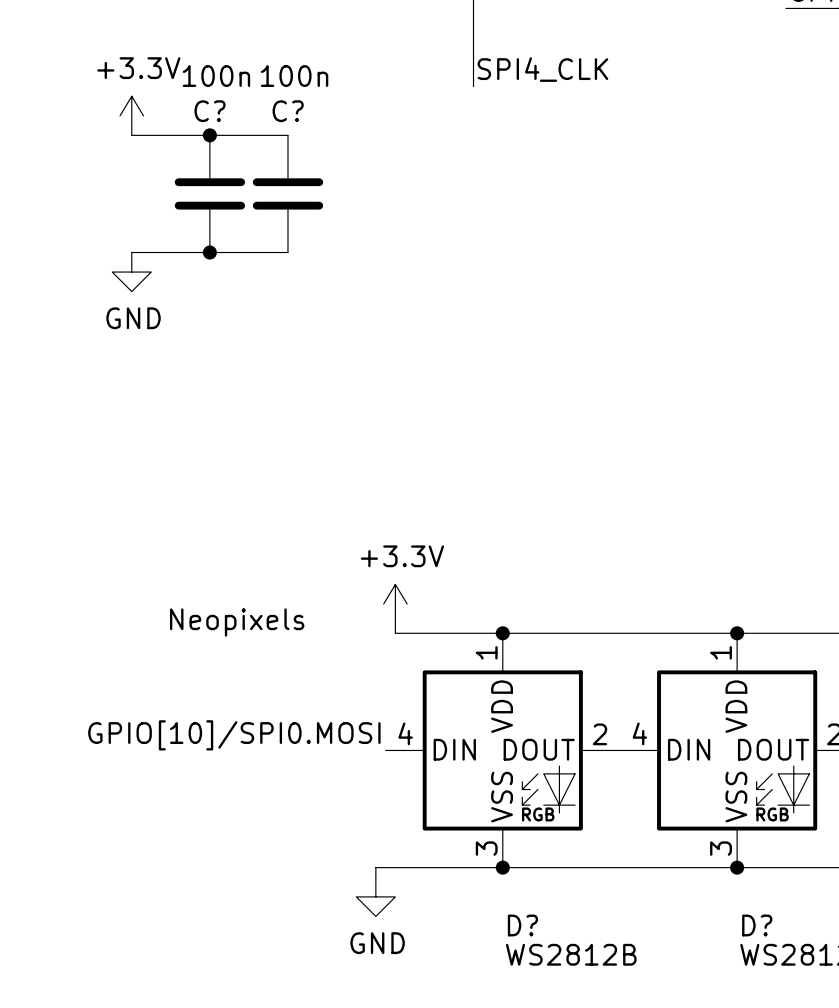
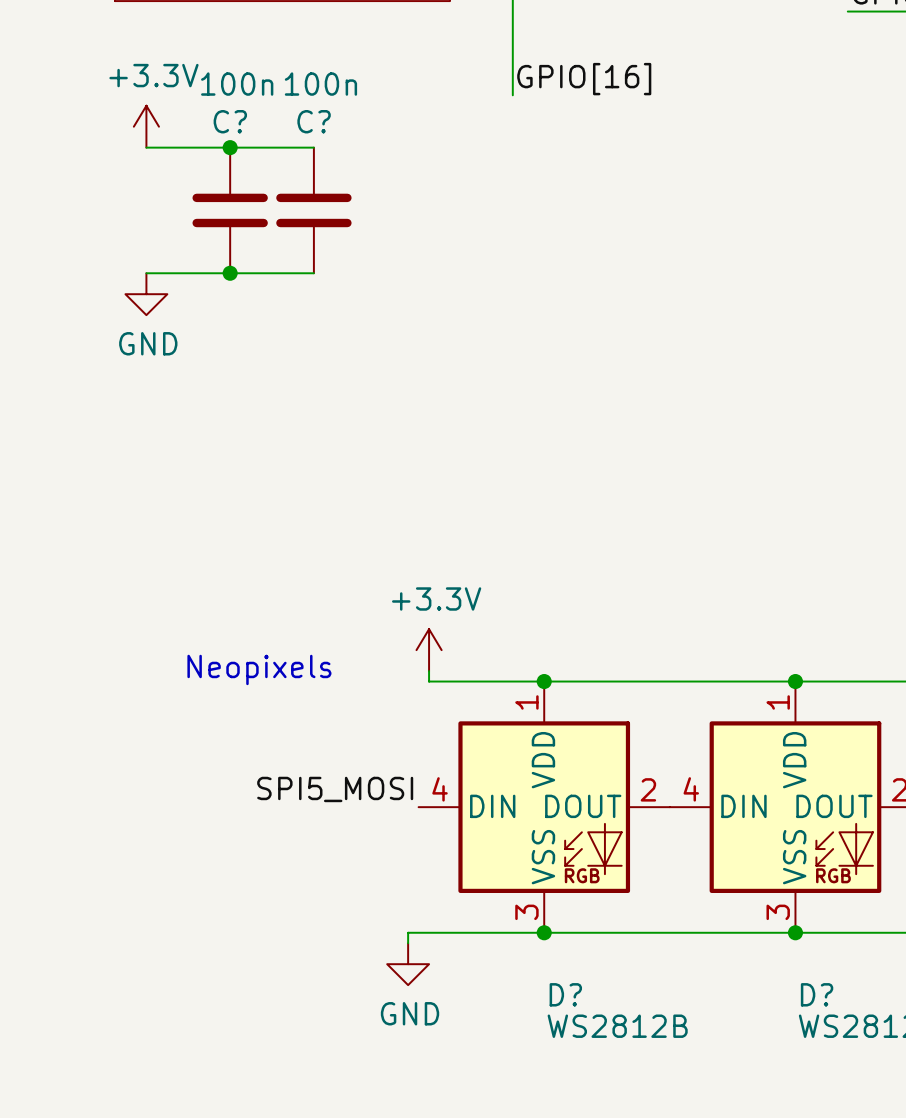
label: SPI4_CLK (542, 69) -> GPIO[16] (584, 79)
label: GPIO[10]/SPI0.MOSI (234, 735) -> SPI5_MOSI (335, 789)

